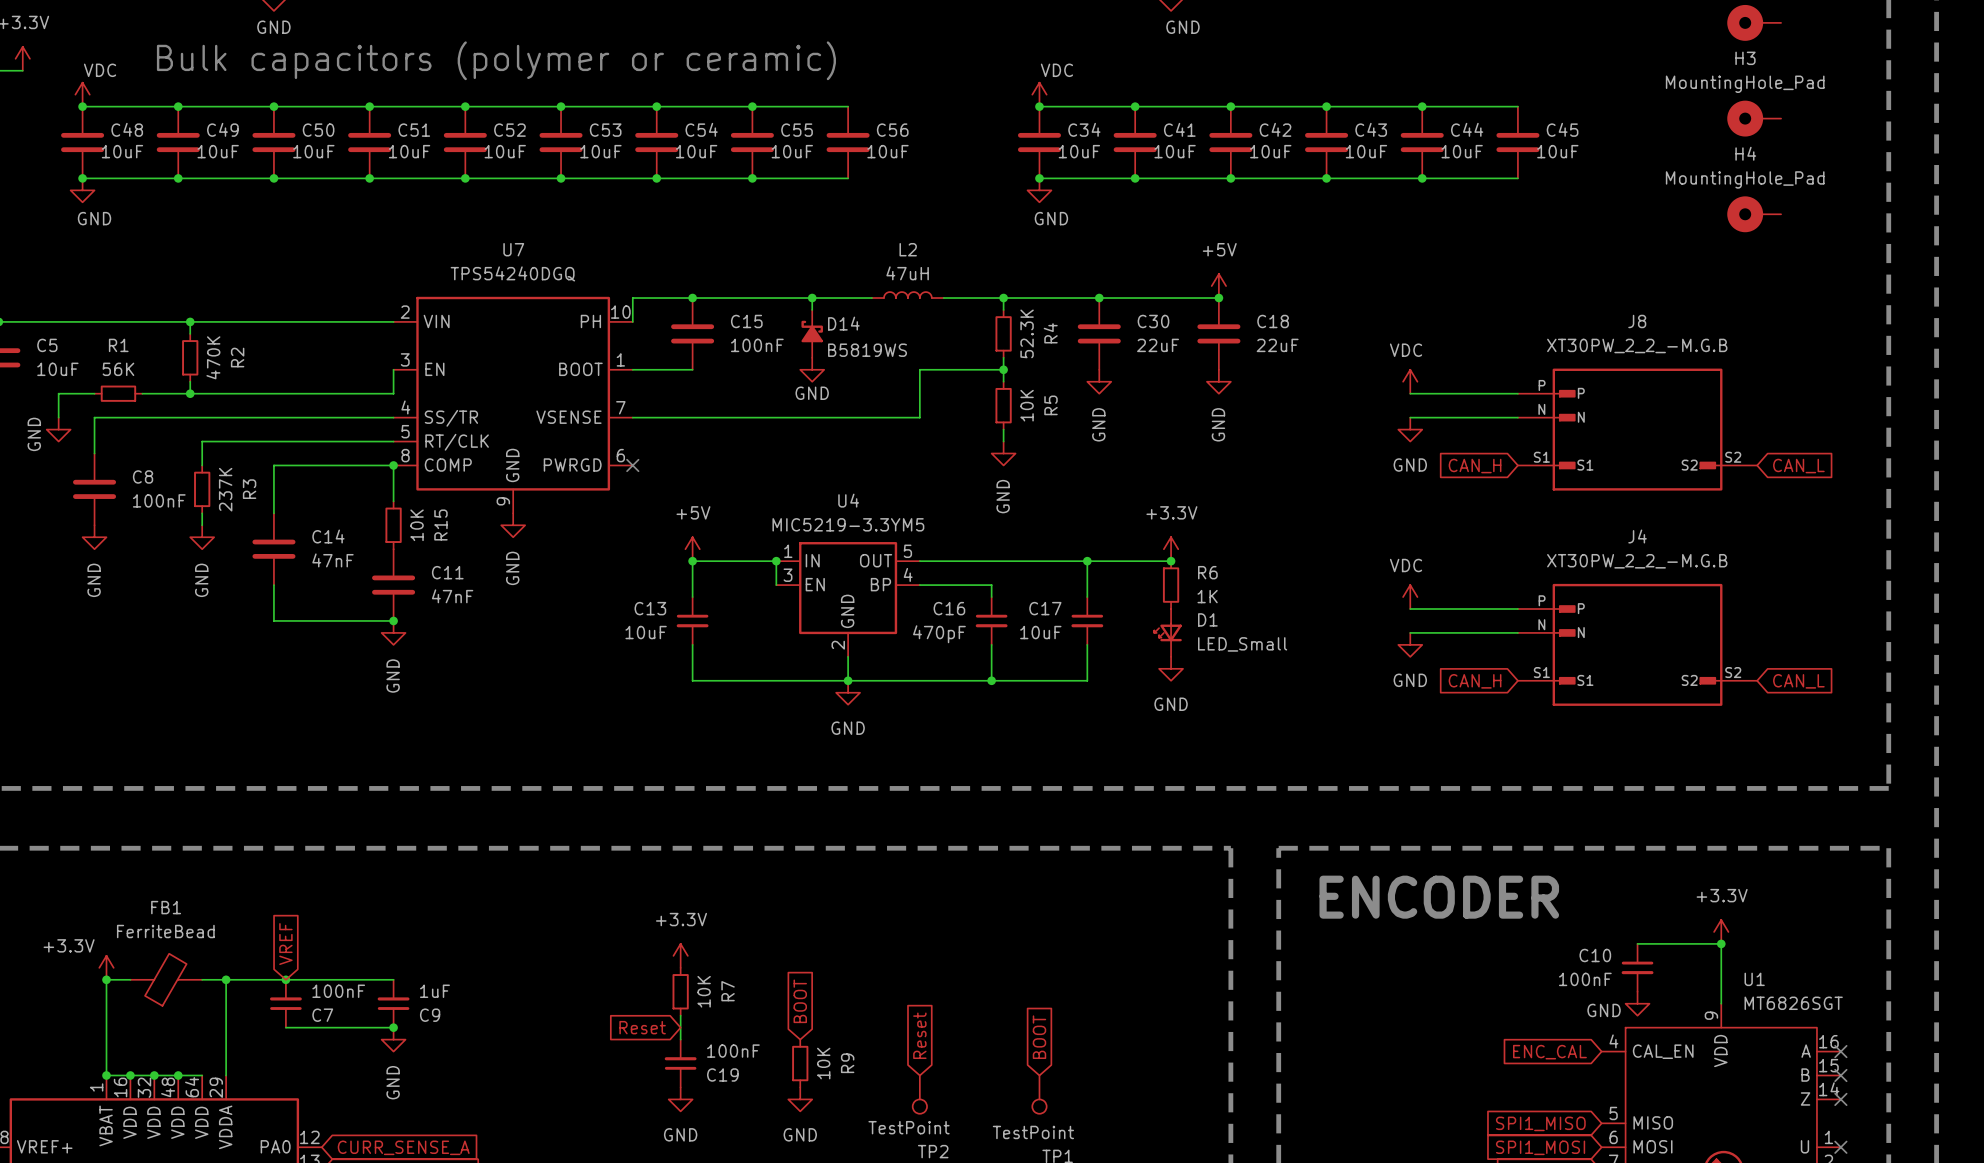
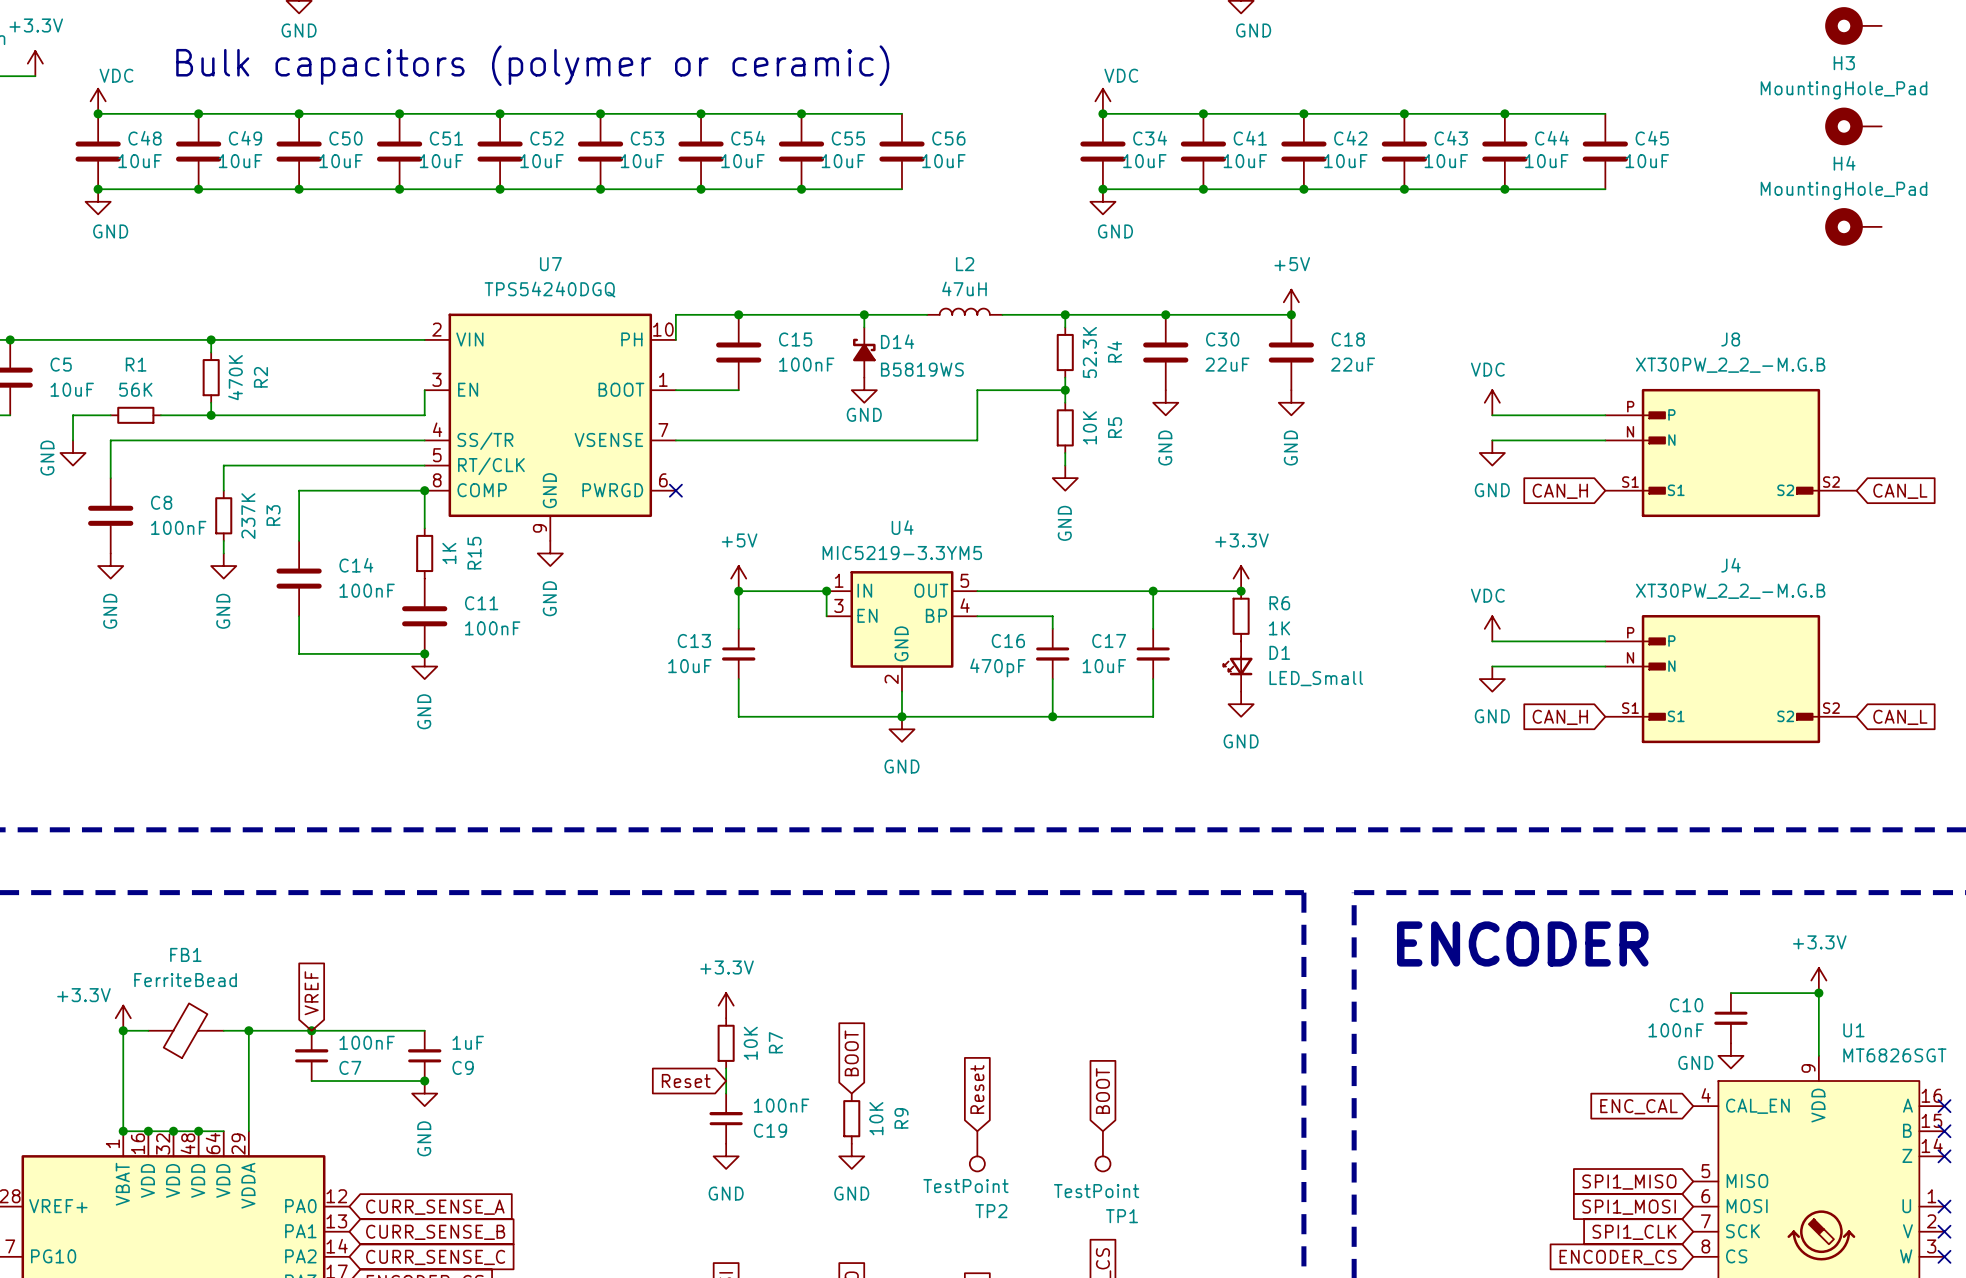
R15 value: 10K (417, 525) -> 1K (449, 553)
C14 value: 47nF (333, 560) -> 100nF (367, 590)
C11 value: 47nF (452, 596) -> 100nF (492, 628)

